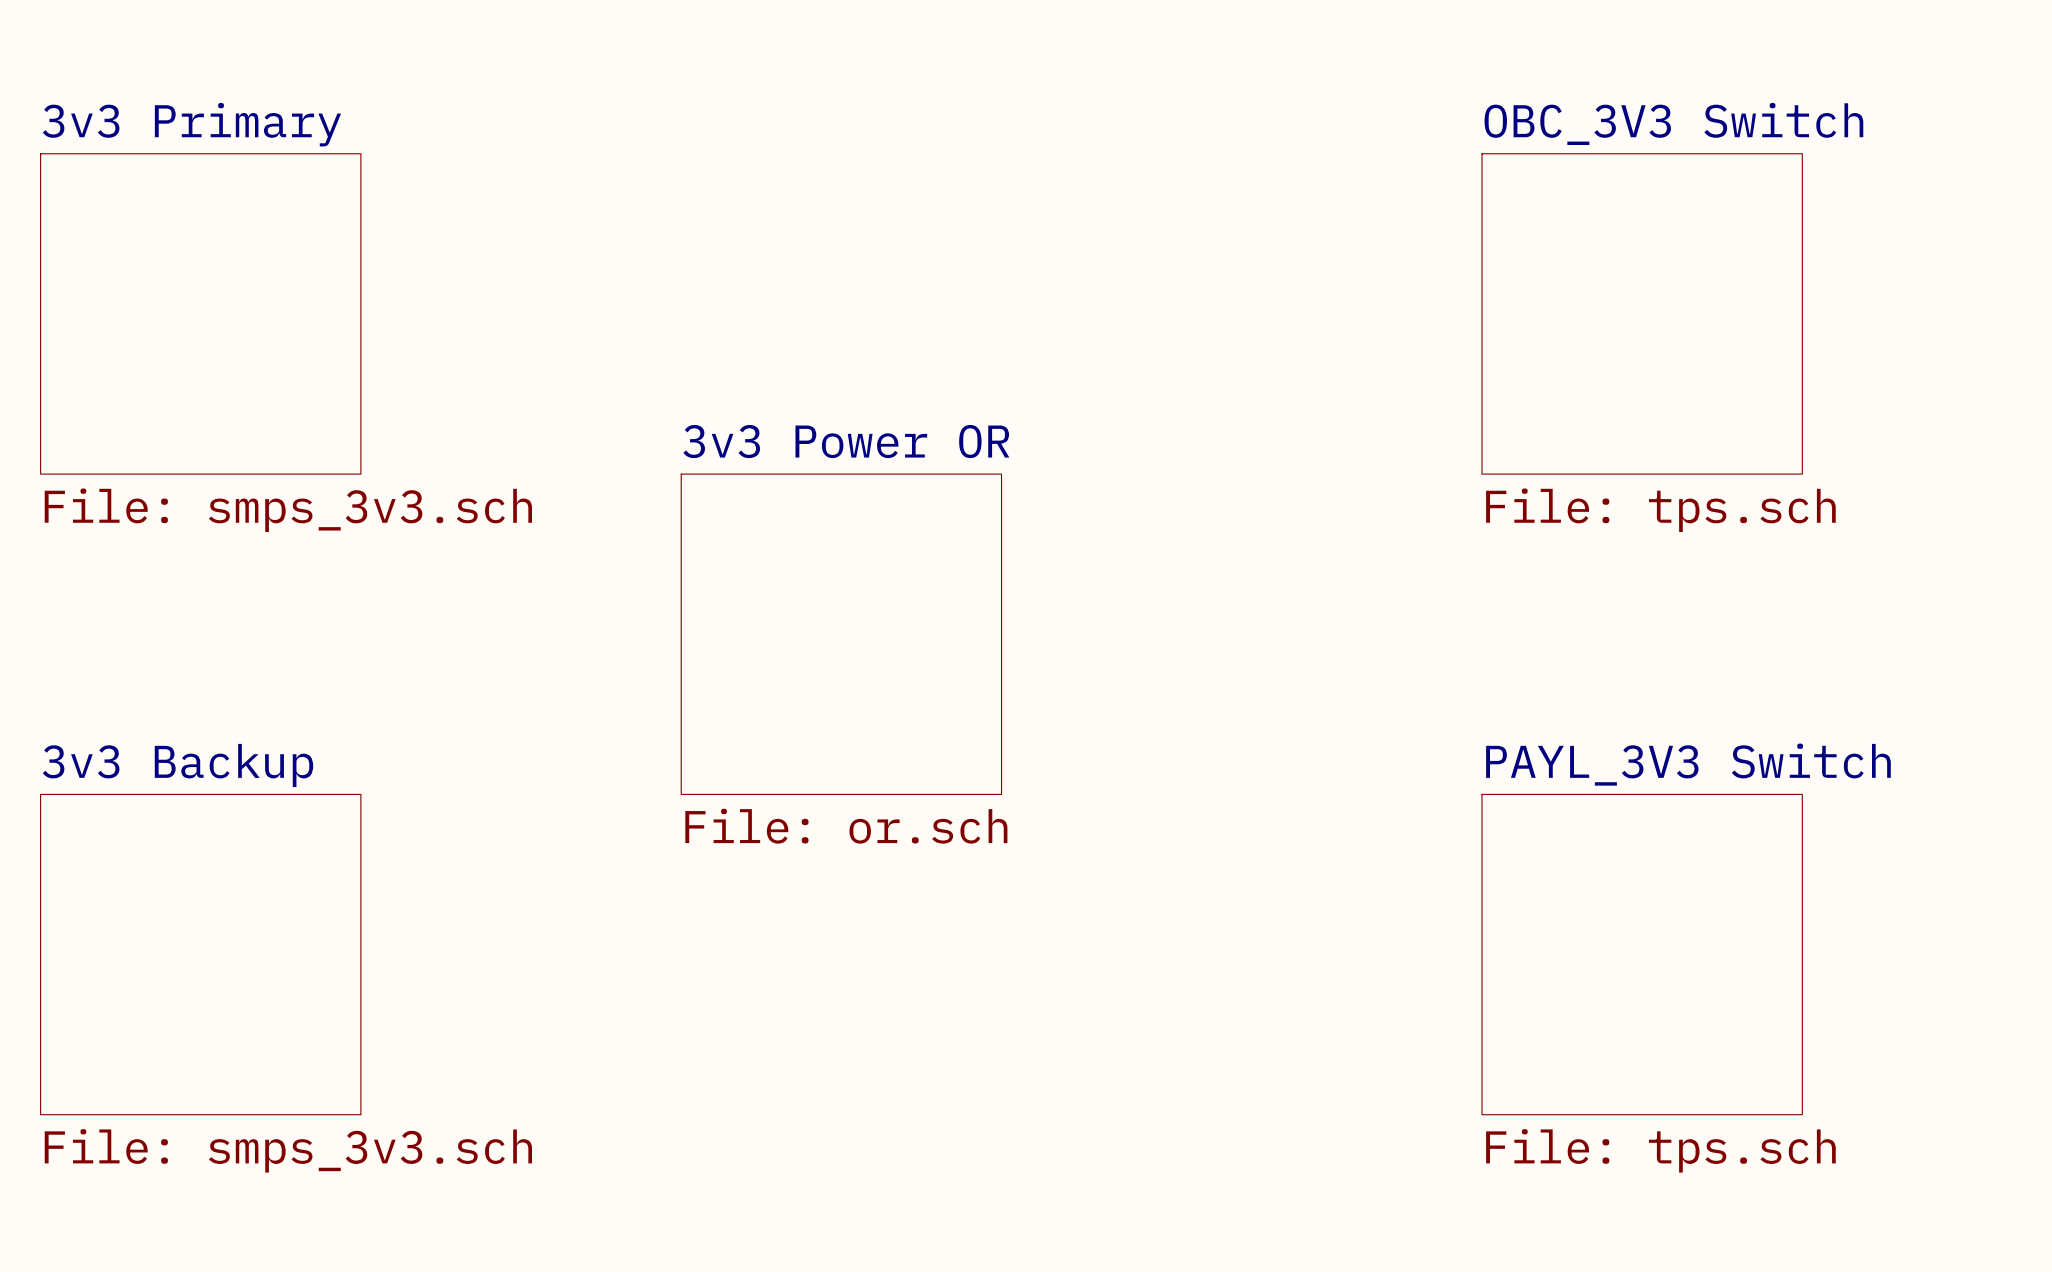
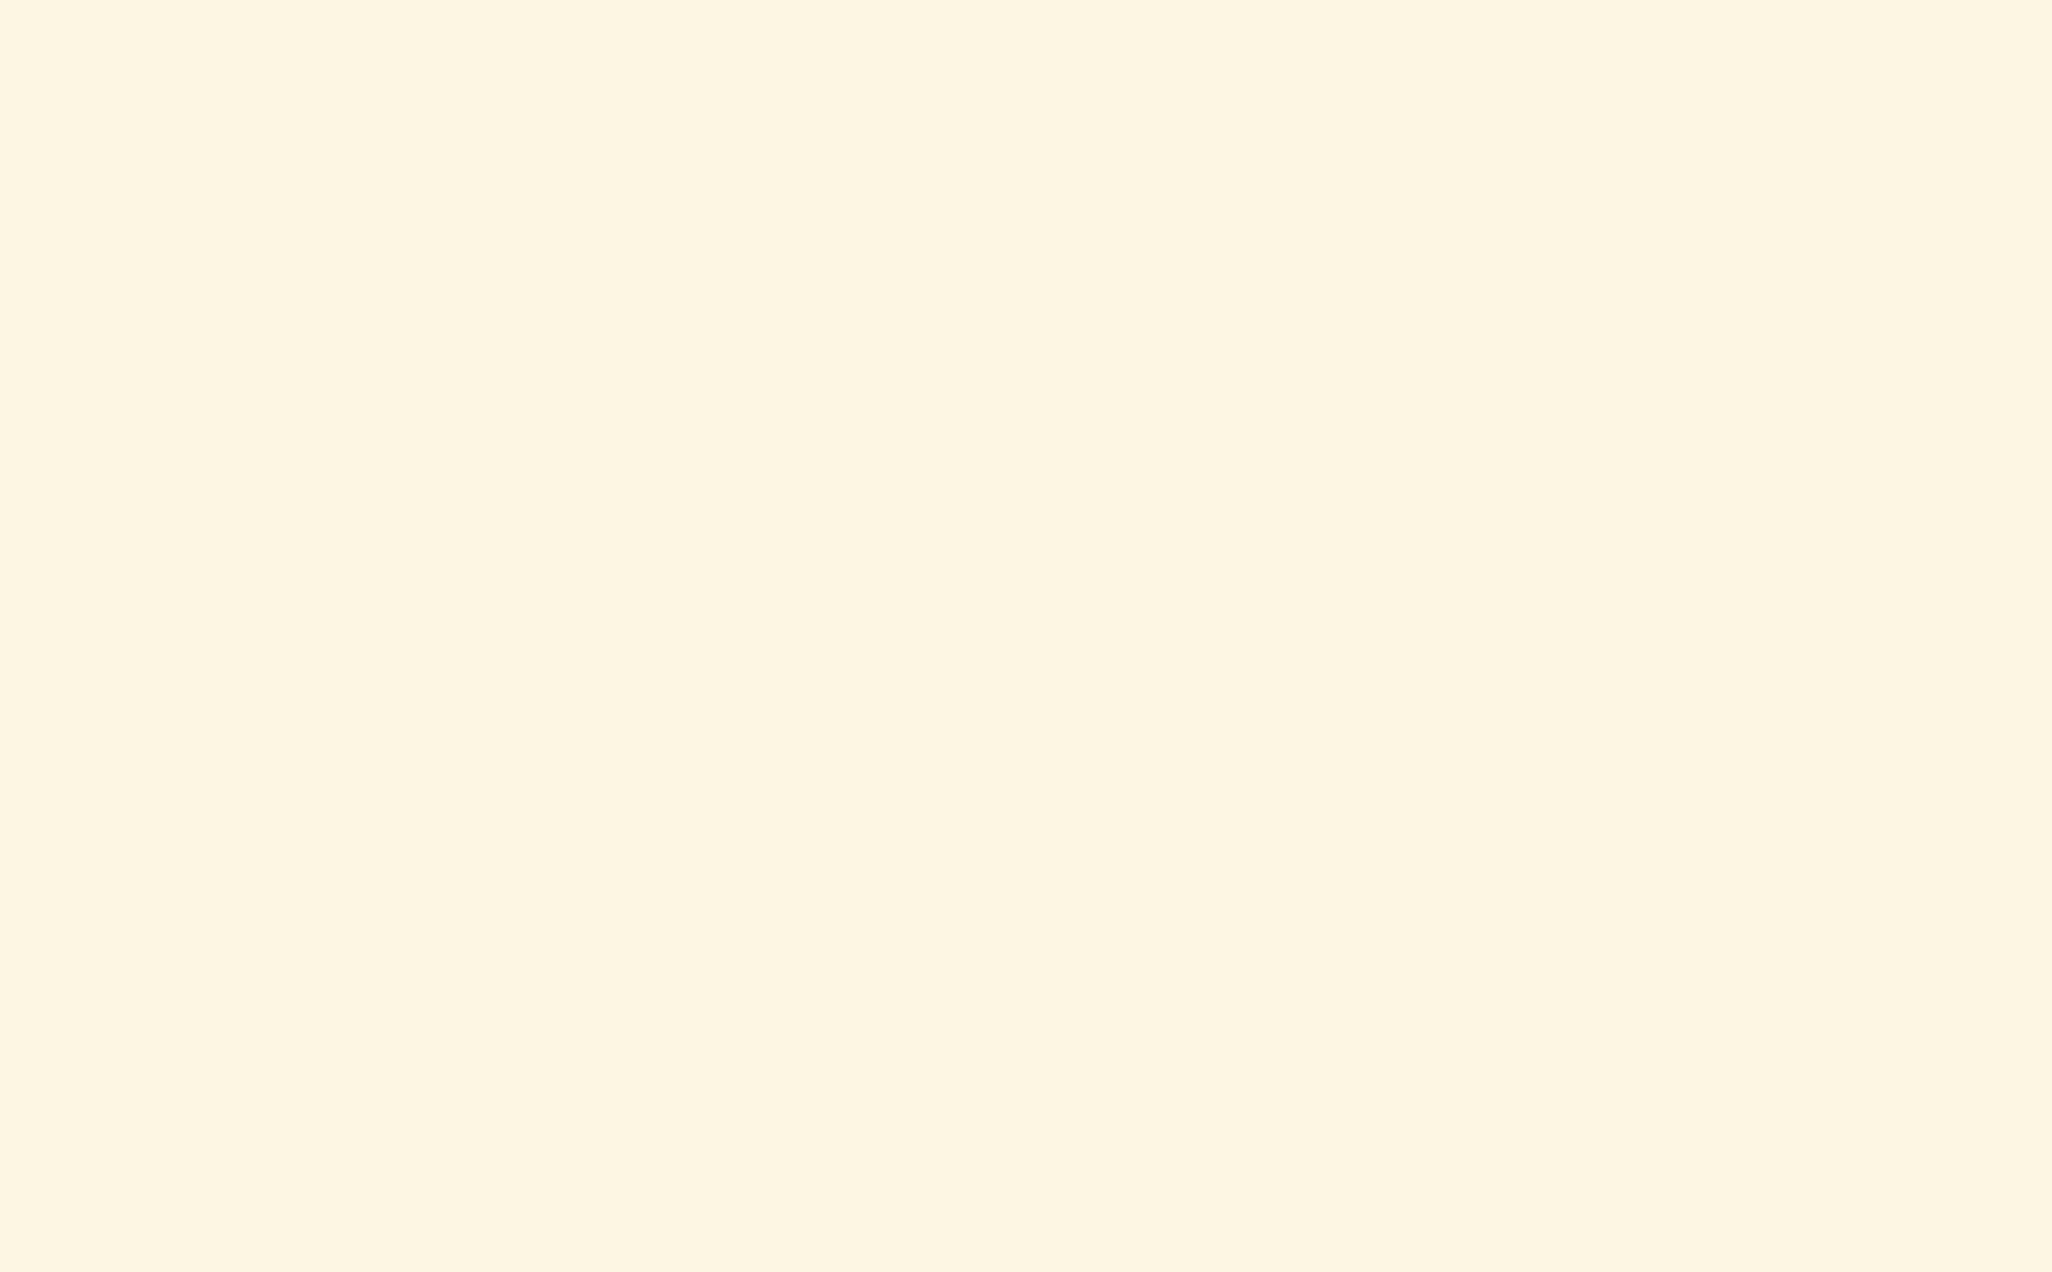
sheet 3v3 Primary: File: smps_3v3.sch (200, 313) -> none
sheet OBC_3V3 Switch: File: tps.sch (1642, 313) -> none
sheet 3v3 Power OR: File: or.sch (841, 634) -> none
sheet 3v3 Backup: File: smps_3v3.sch (200, 954) -> none
sheet PAYL_3V3 Switch: File: tps.sch (1642, 954) -> none

